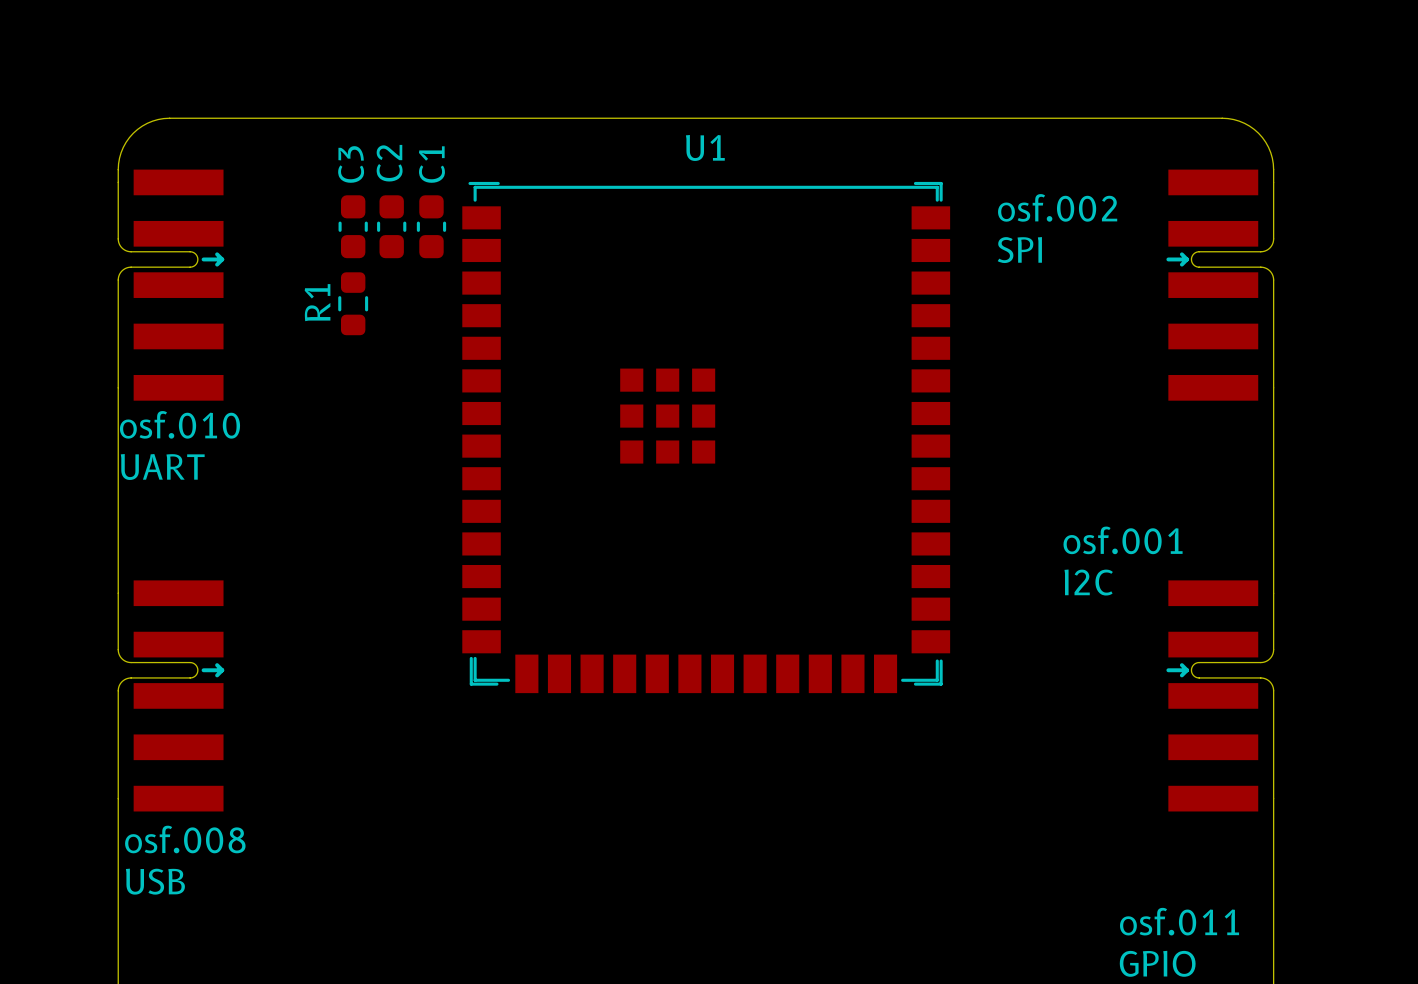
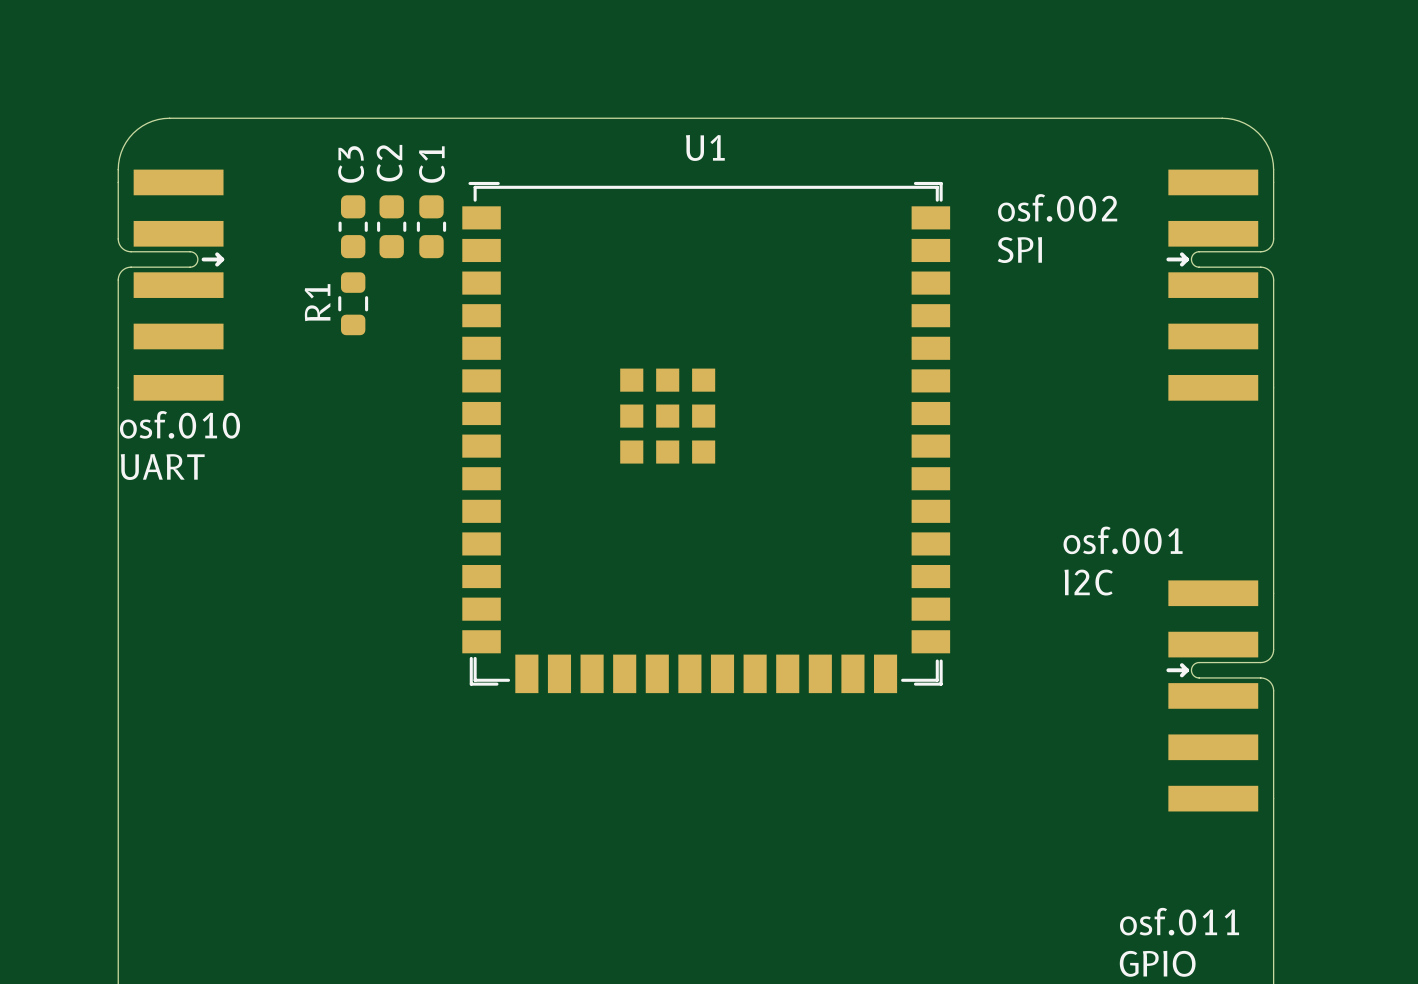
board edge: none -> (118, 593) (118, 798)
part: (170, 695) -> none
text: osf.008 (185, 839) -> none
text: USB (155, 881) -> none

